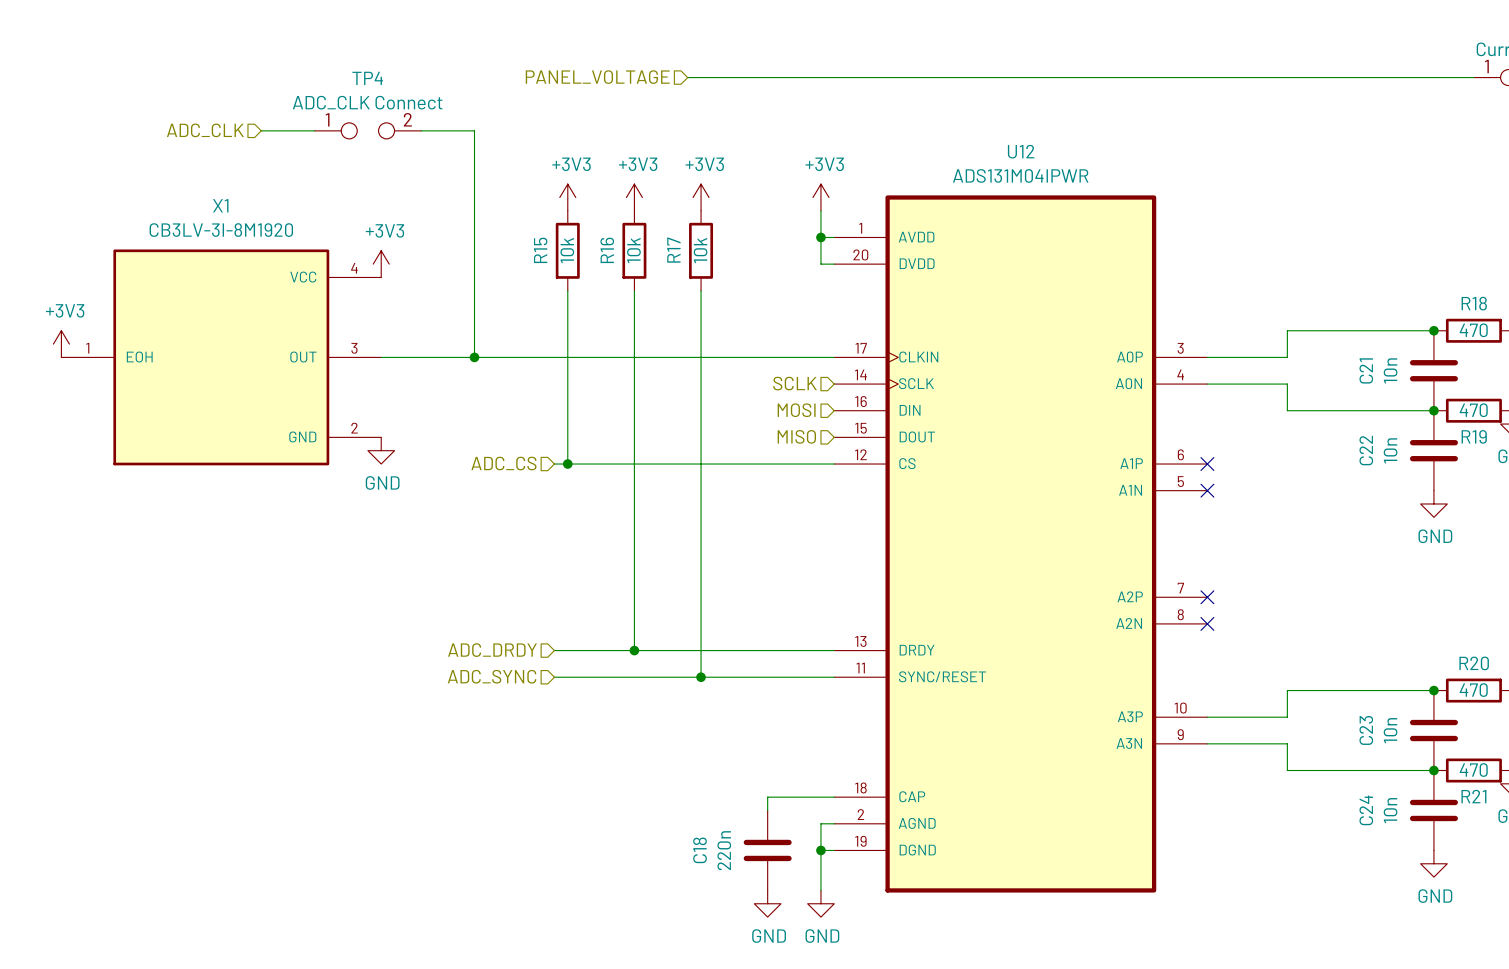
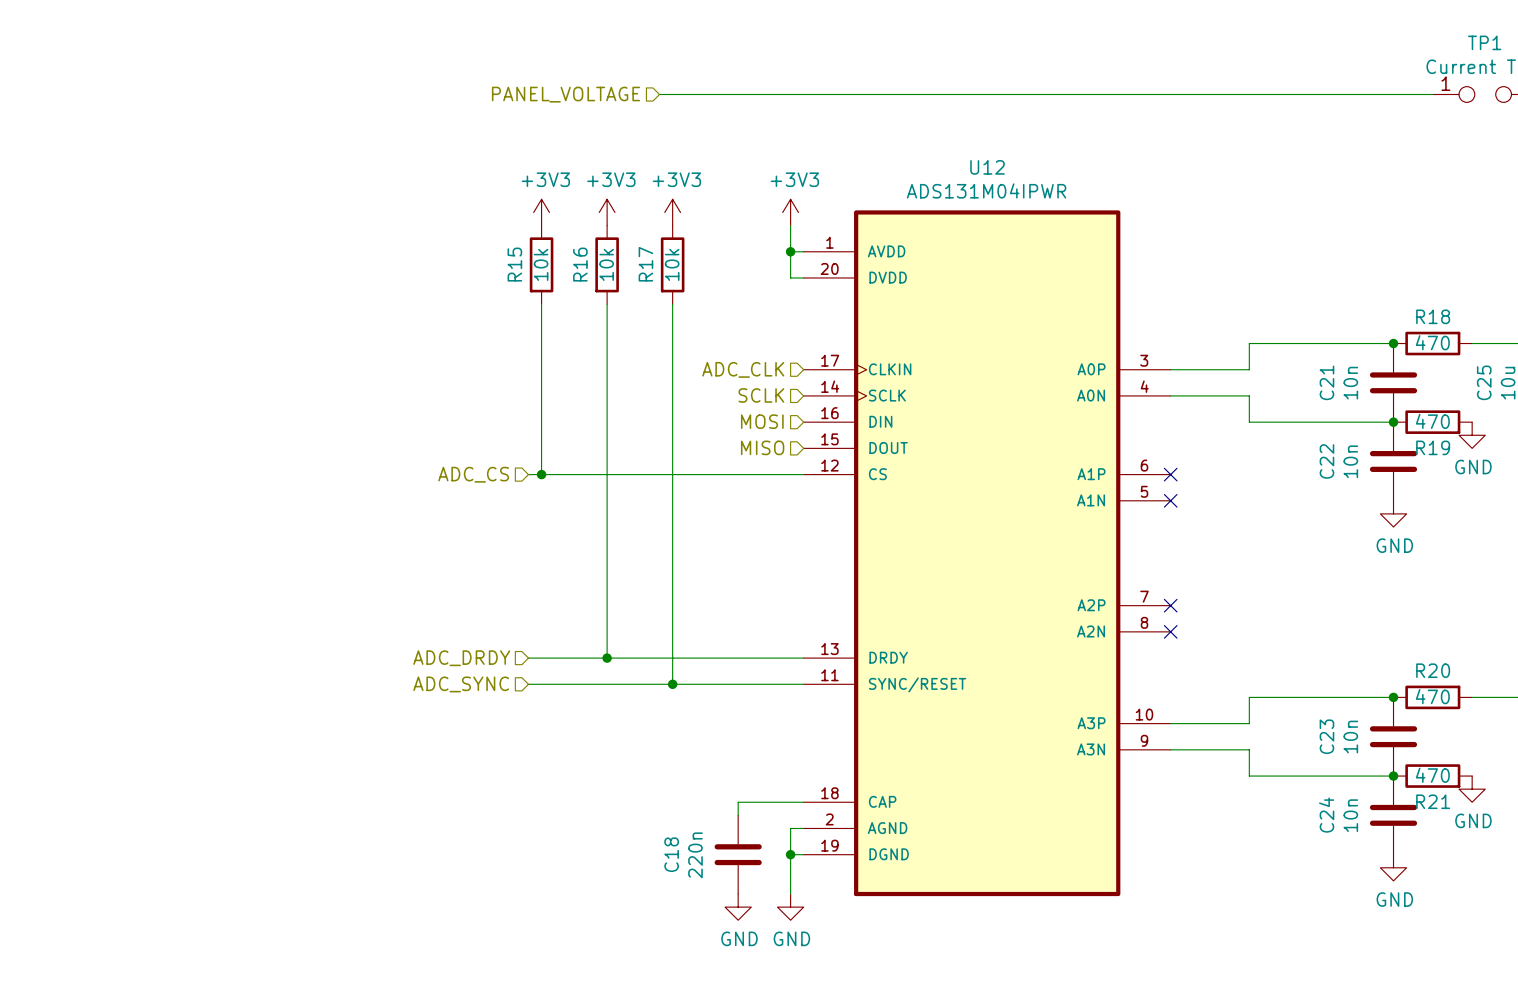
hierarchical label: ADC_CLK (205, 130) -> none
wire: (261, 130) (314, 130) -> none
TP4: ADC_CLK Connect (367, 130) -> none
wire: (421, 130) (474, 130) (474, 357) -> none
power symbol: +3V3 (381, 264) -> none
power symbol: +3V3 (61, 344) -> none
hierarchical label: none -> ADC_CLK (743, 369)
X1: CB3LV-3I-8M1920 (221, 357) -> none
wire: (381, 357) (834, 357) -> none
junction: (474, 357) -> none
power symbol: GND (381, 450) -> none

